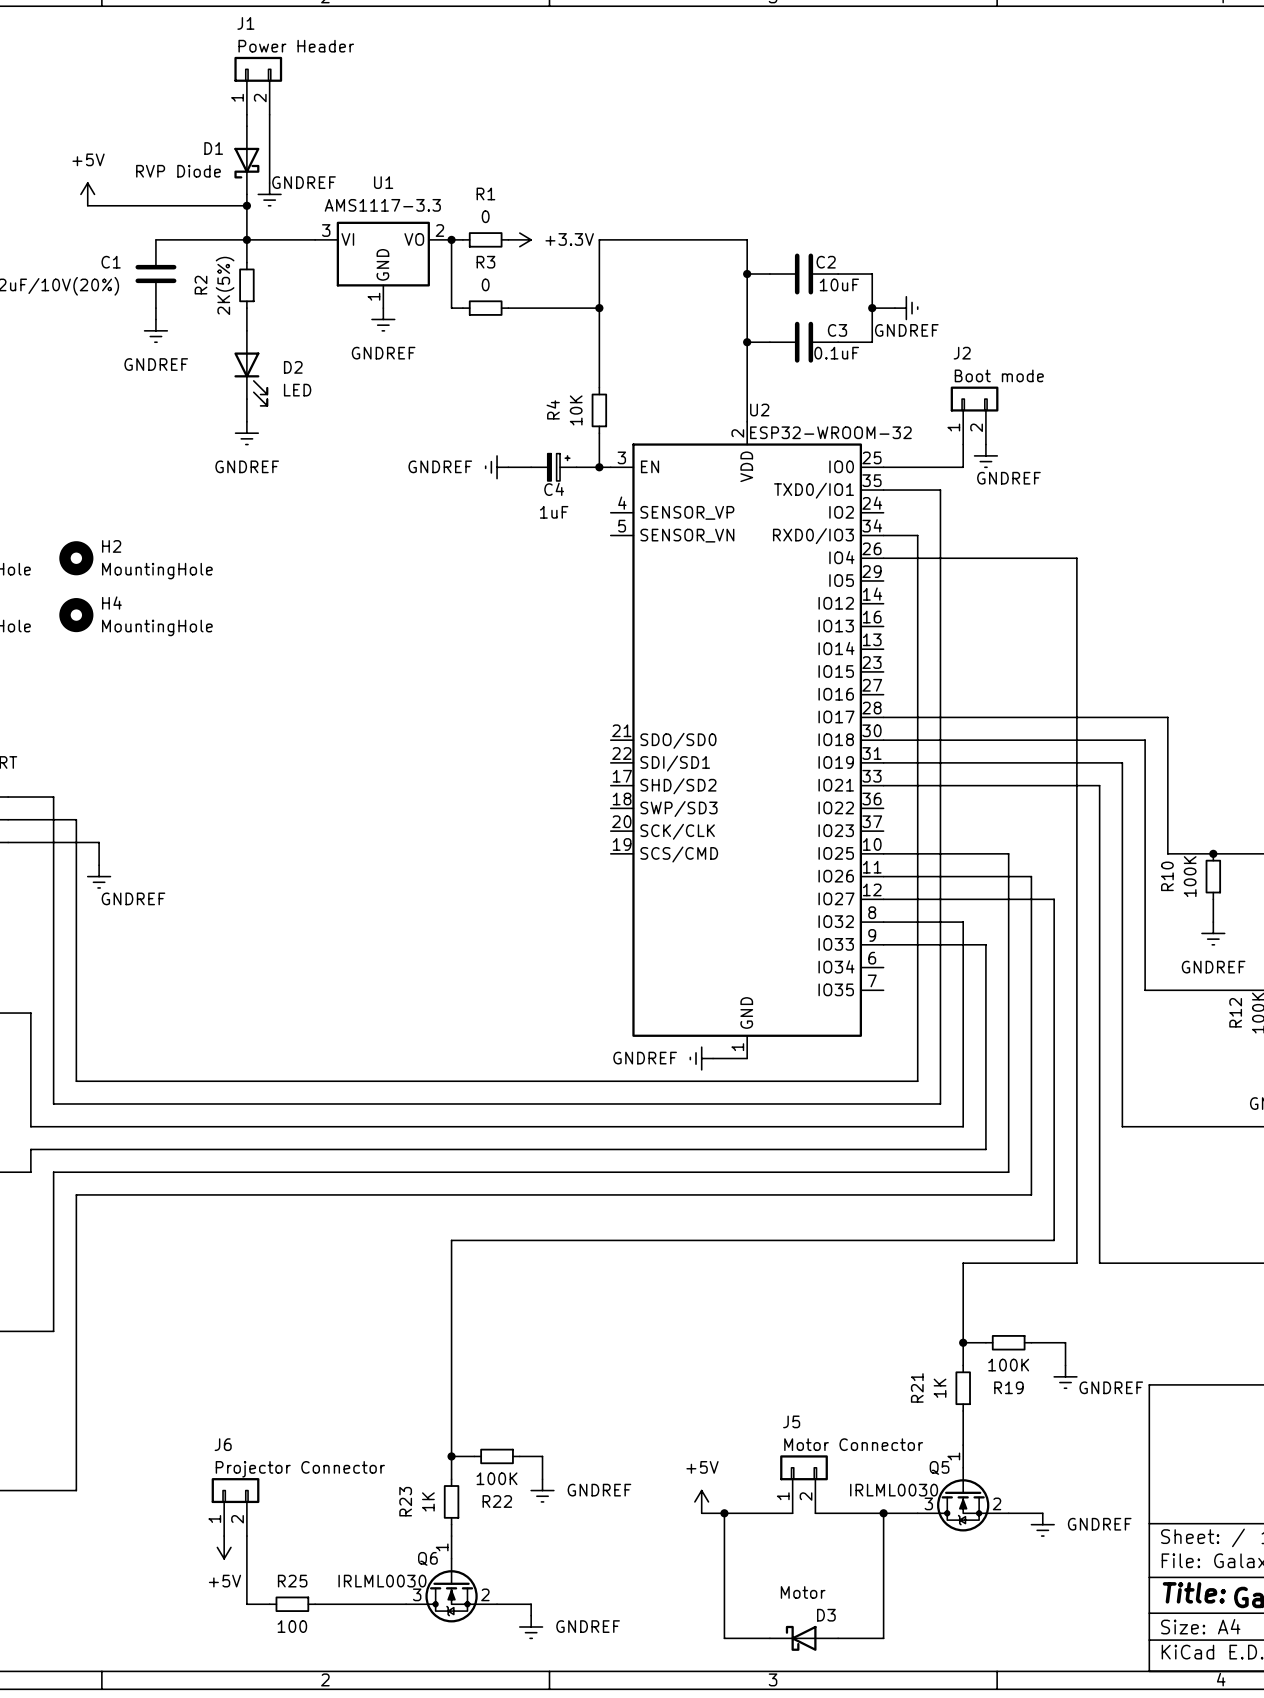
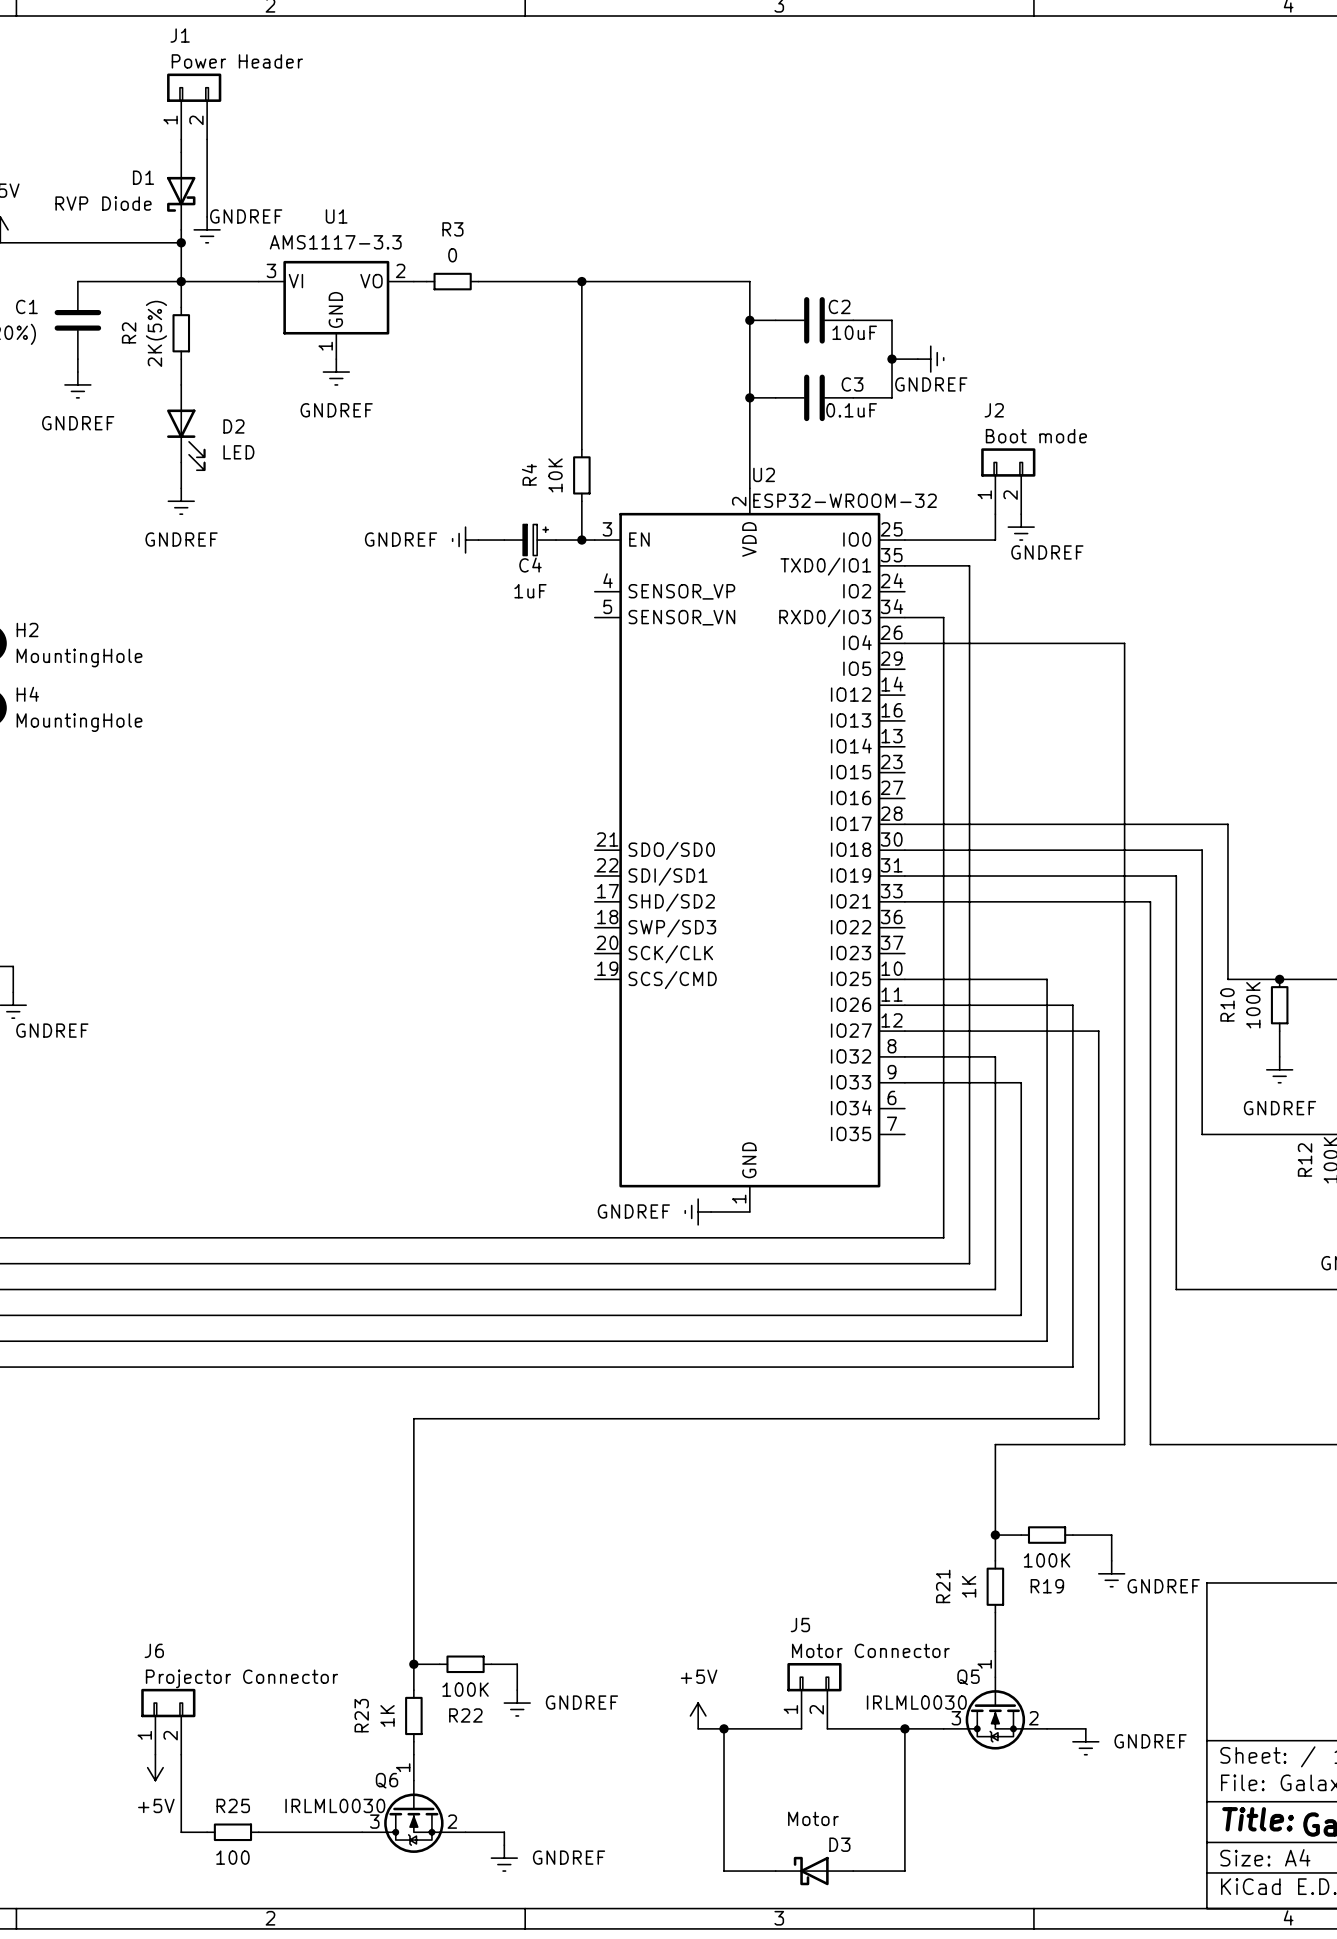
R1 name: R1 (485, 193) -> R3 (452, 229)
wire: (451, 239) (451, 308) (462, 308) -> none
junction: (451, 239) -> none
power symbol: +3.3V (519, 239) -> none
junction: none -> (581, 281)
R3: 0 (485, 308) -> none
wire: (508, 308) (599, 308) -> (478, 281) (581, 281)
junction: (599, 308) -> none

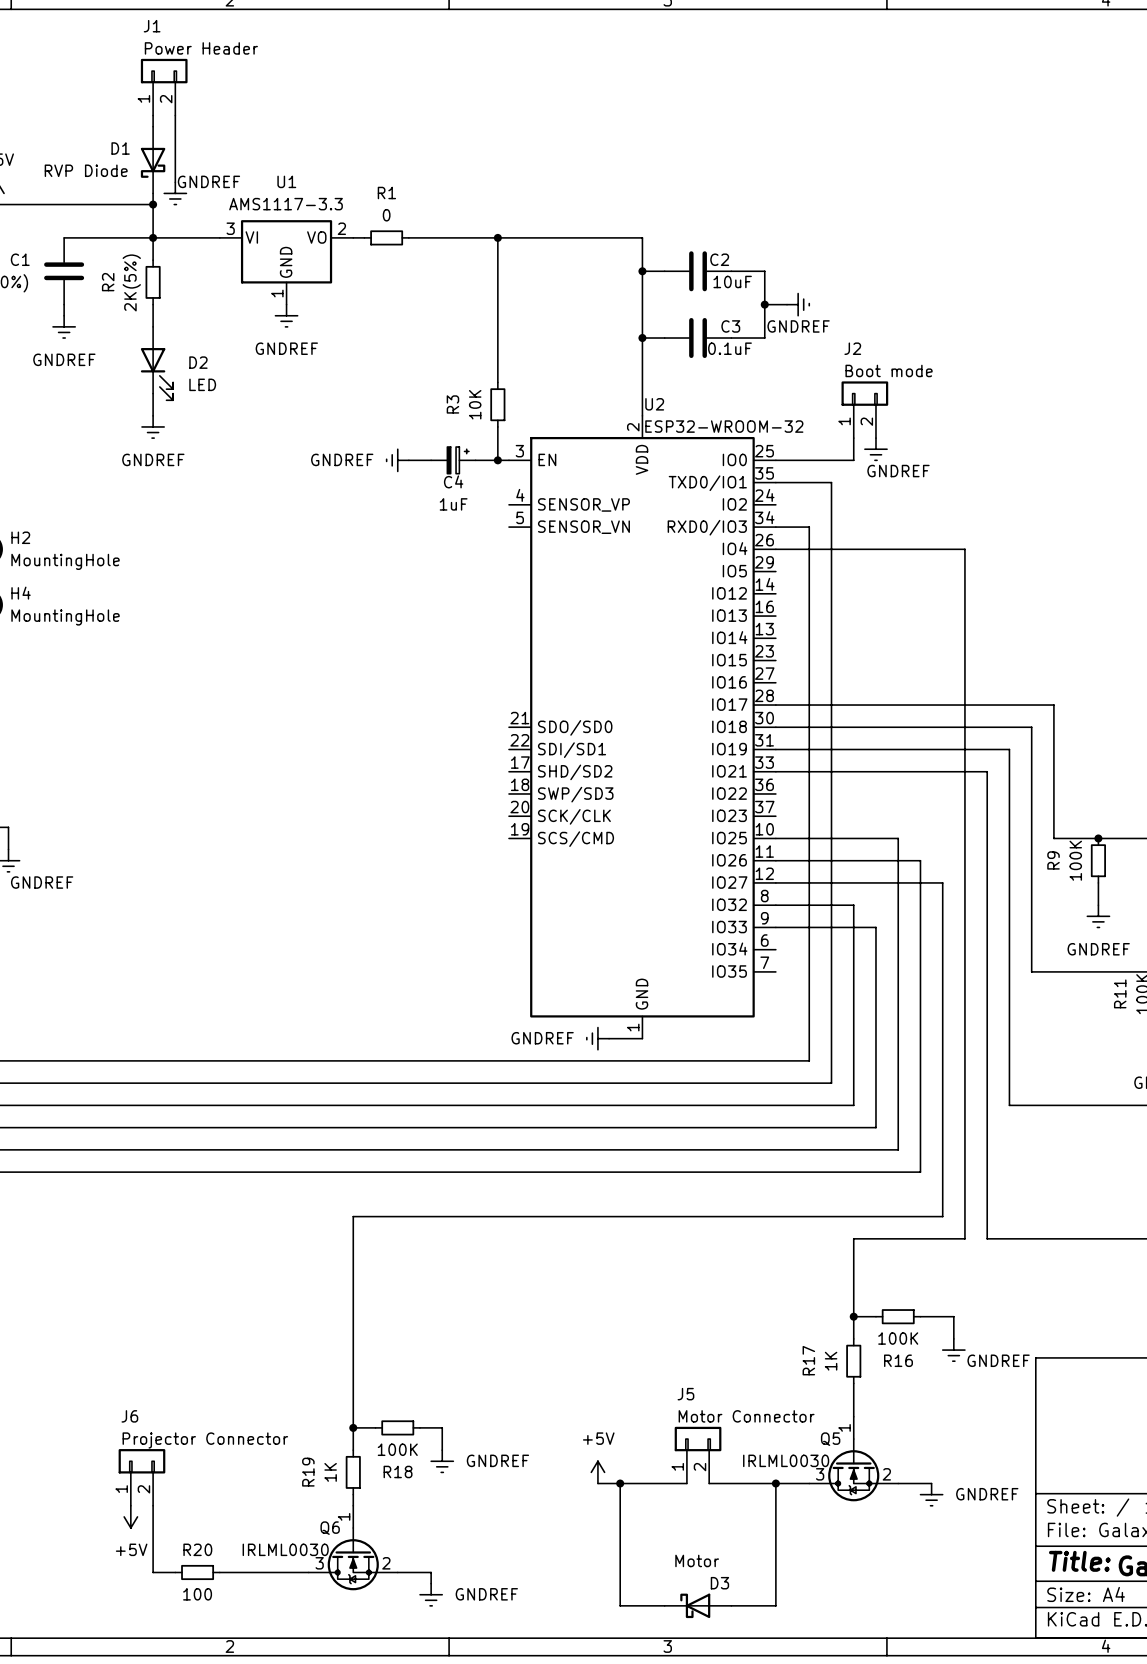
R3 name: R3 (452, 229) -> R1 (386, 193)
R4 name: R4 (529, 474) -> R3 (452, 404)
R10 name: R10 (1227, 1004) -> R9 (1053, 860)
R12 name: R12 (1305, 1159) -> R11 (1120, 993)
R21 name: R21 (943, 1586) -> R17 (808, 1360)
R19 name: R19 (1047, 1586) -> R16 (898, 1360)
R23 name: R23 (361, 1715) -> R19 (308, 1472)
R22 name: R22 (465, 1715) -> R18 (398, 1471)
R25 name: R25 (233, 1805) -> R20 (197, 1549)

